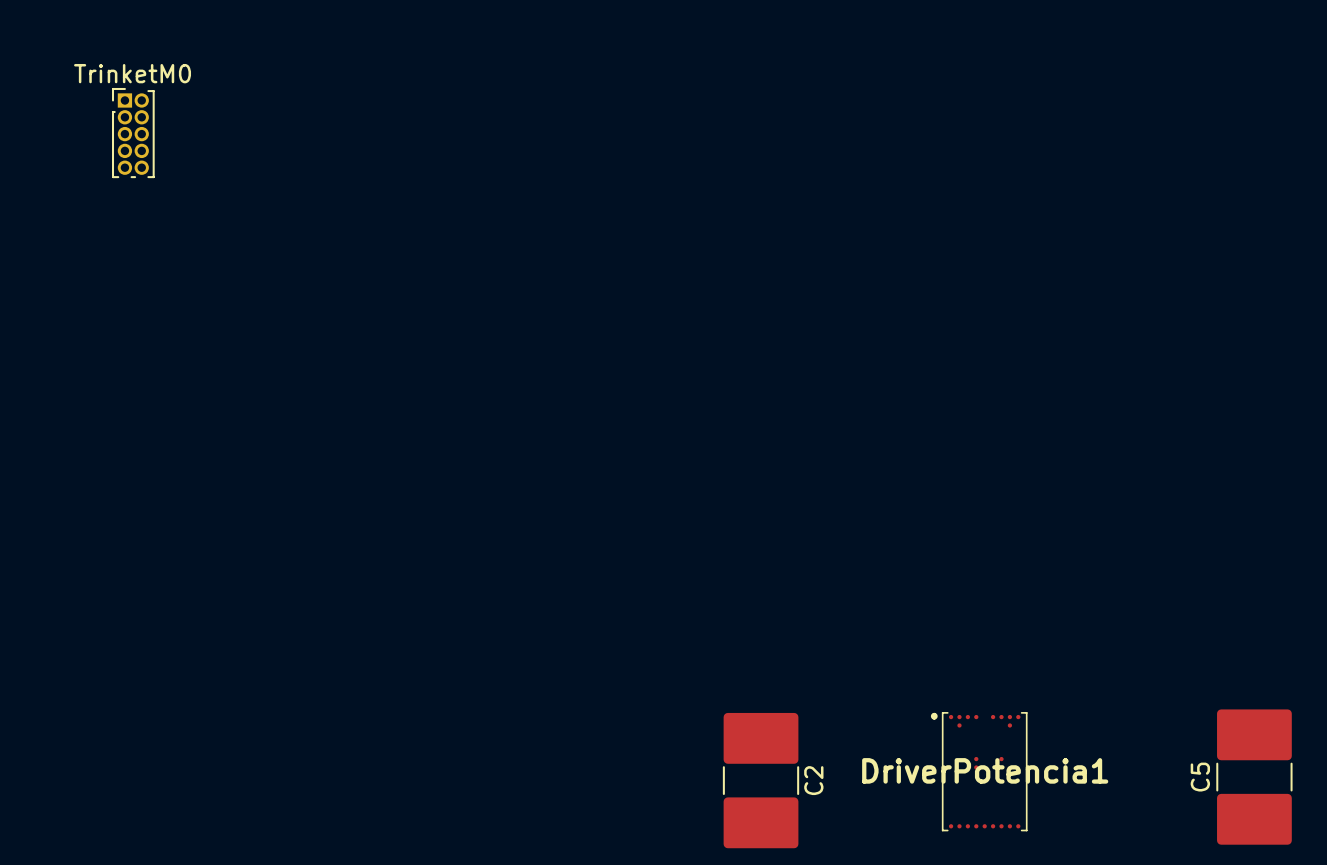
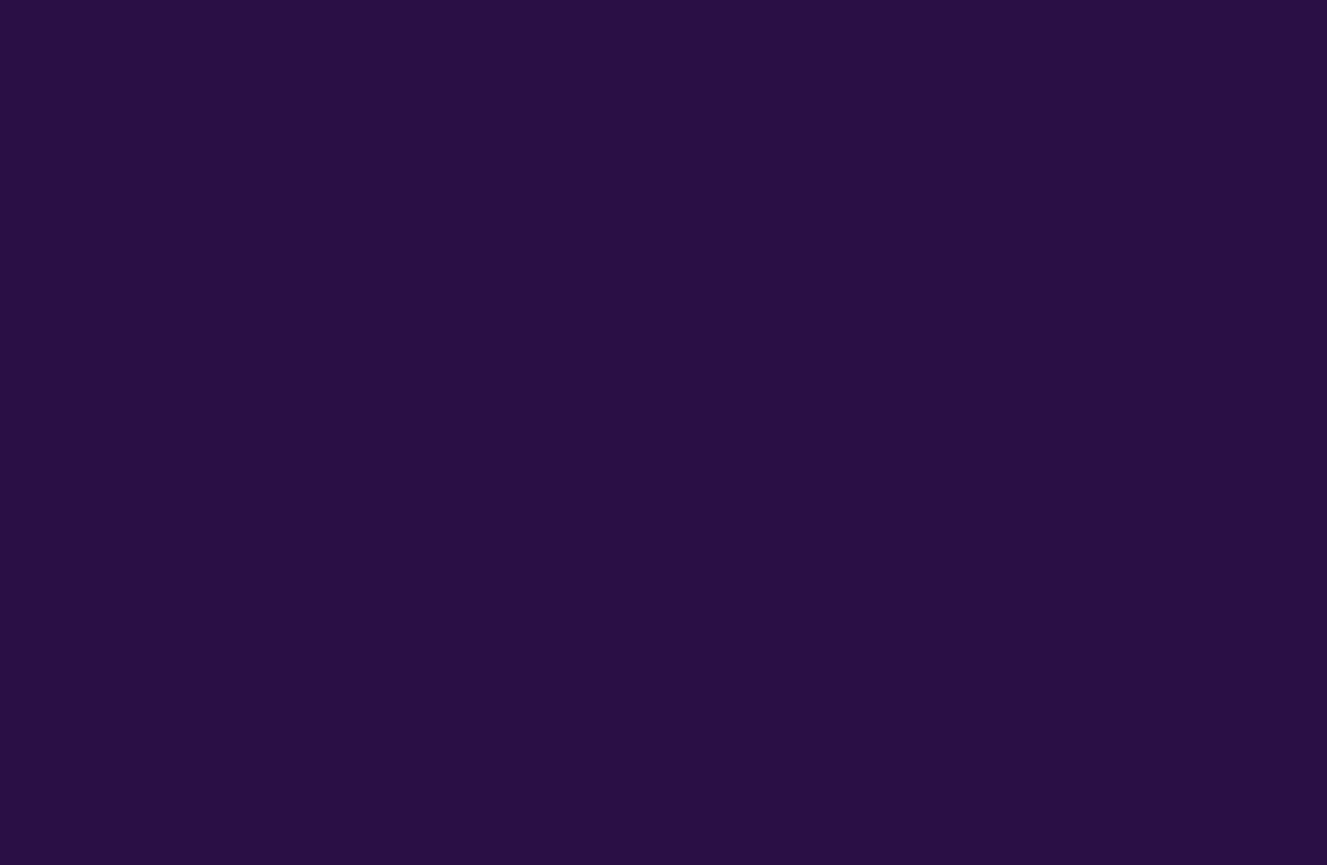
TrinketM0: (133, 133) -> none
DriverPotencia1: (979, 771) -> none
C5: (1254, 777) -> none
C2: (761, 780) -> none

